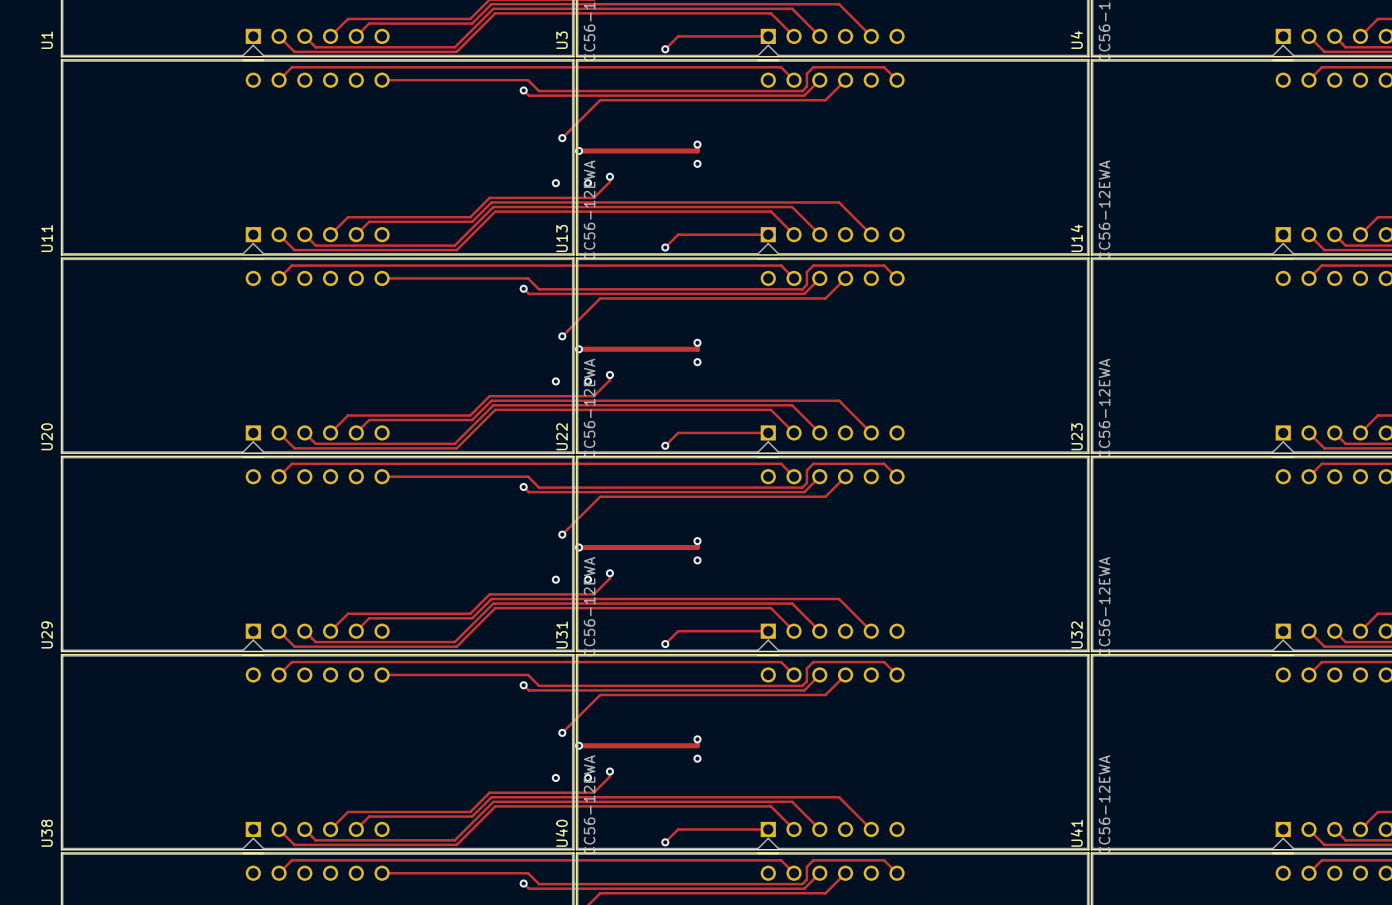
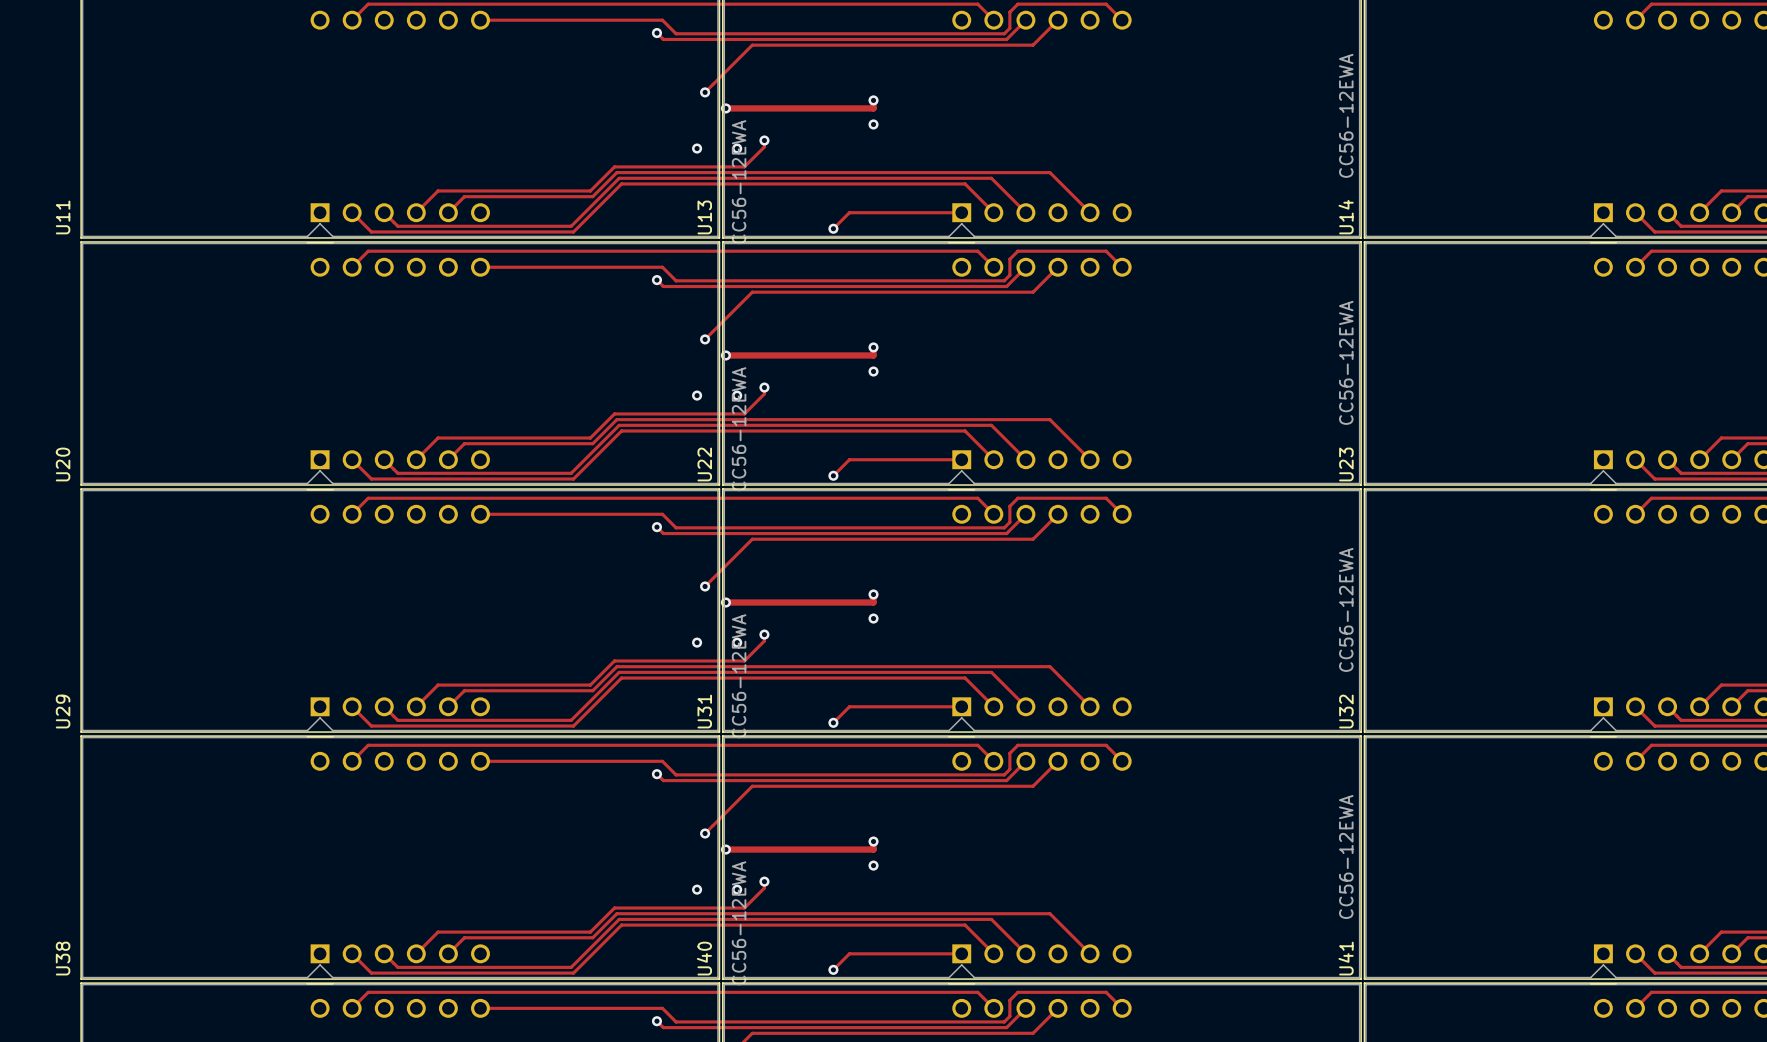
U13 value position: CC56-12EWA (1104, 210) -> CC56-12EWA (1346, 115)
U22 value position: CC56-12EWA (1104, 408) -> CC56-12EWA (1346, 362)
U31 value position: CC56-12EWA (1104, 606) -> CC56-12EWA (1346, 609)
U40 value position: CC56-12EWA (1104, 804) -> CC56-12EWA (1346, 856)

